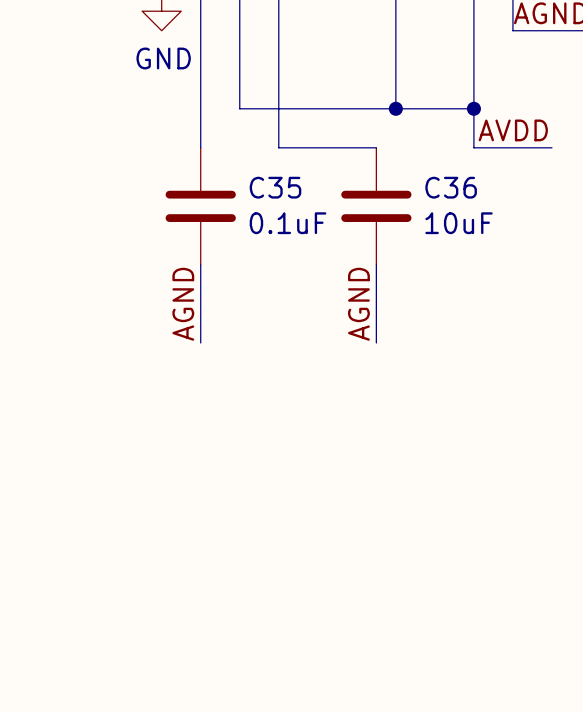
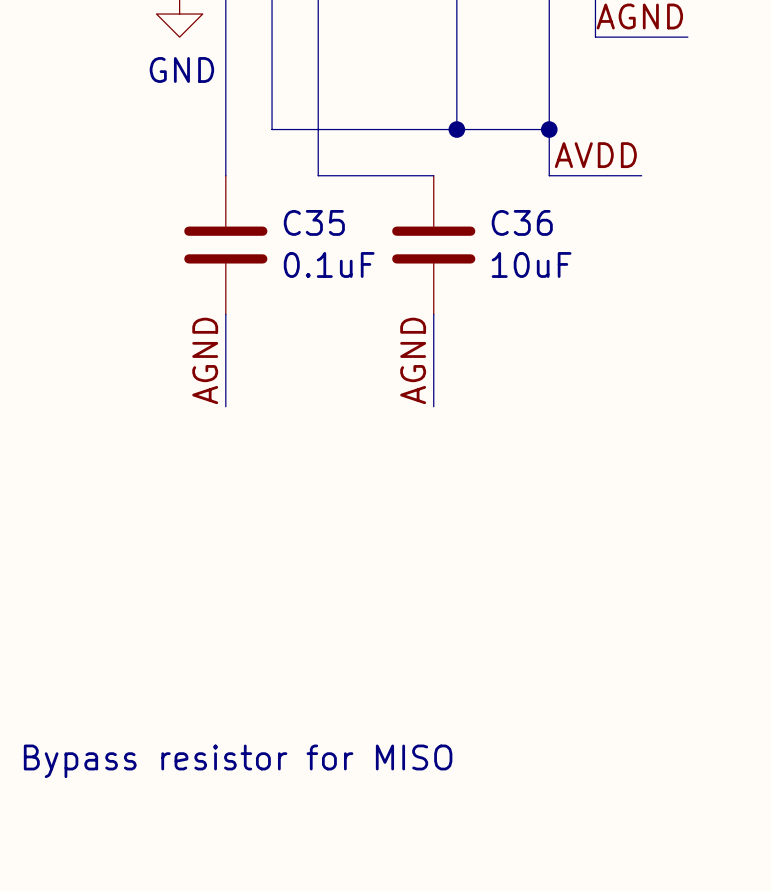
text: none -> Bypass resistor for MISO (238, 761)

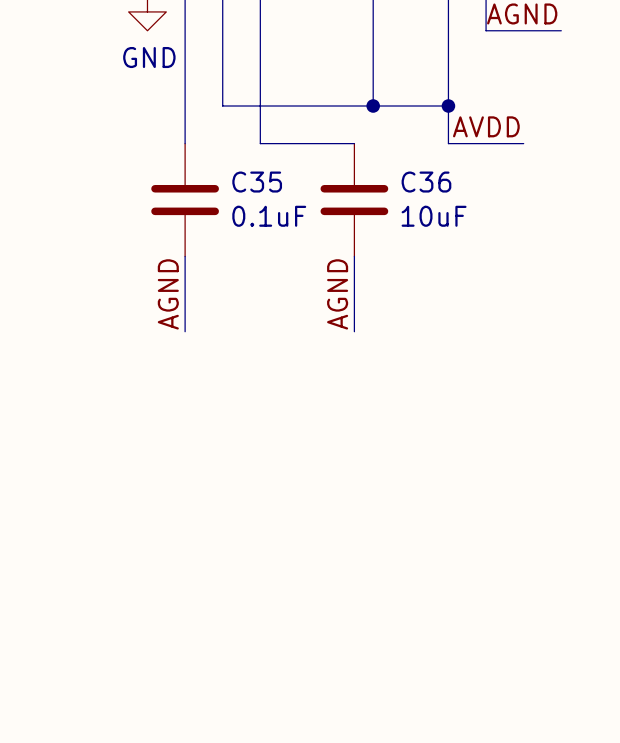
text: Bypass resistor for MISO (238, 761) -> none

